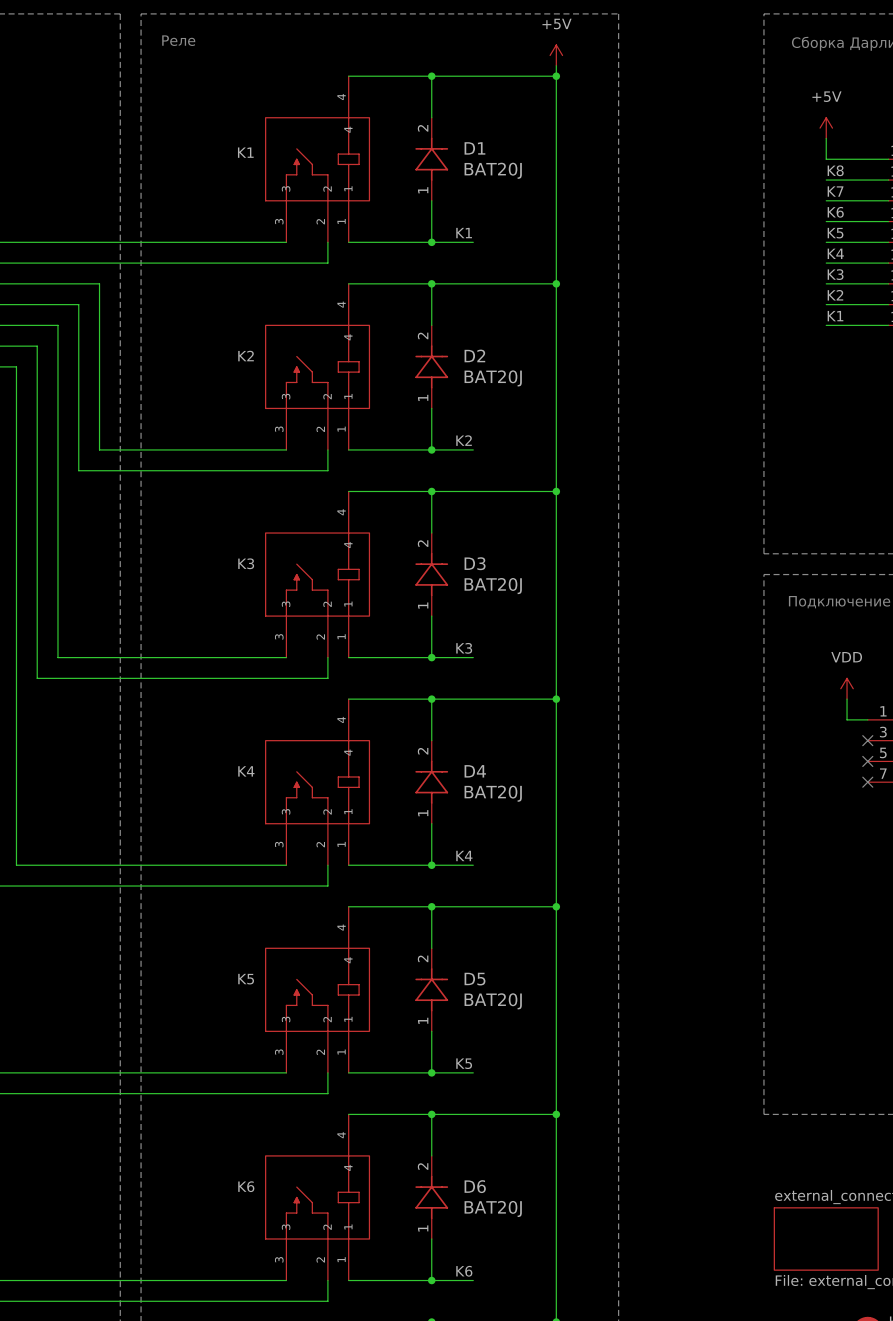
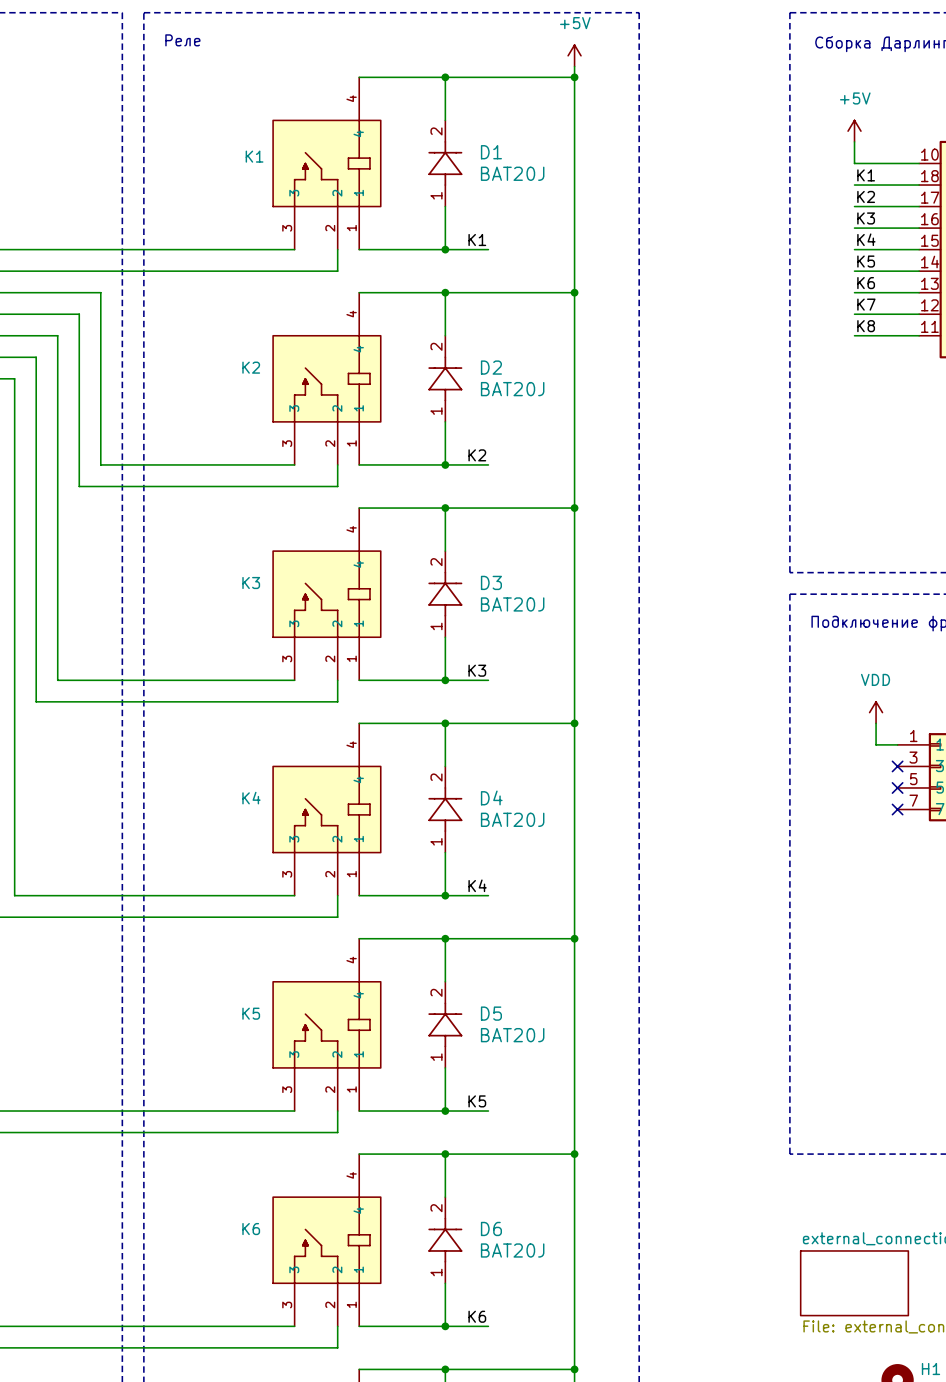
label: K8 (835, 170) -> K1 (866, 175)
label: K7 (835, 191) -> K2 (866, 196)
label: K6 (835, 212) -> K3 (866, 218)
label: K5 (835, 233) -> K4 (866, 239)
label: K4 (835, 253) -> K5 (866, 261)
label: K3 (835, 274) -> K6 (866, 283)
label: K2 (835, 295) -> K7 (866, 304)
label: K1 (835, 316) -> K8 (866, 326)

